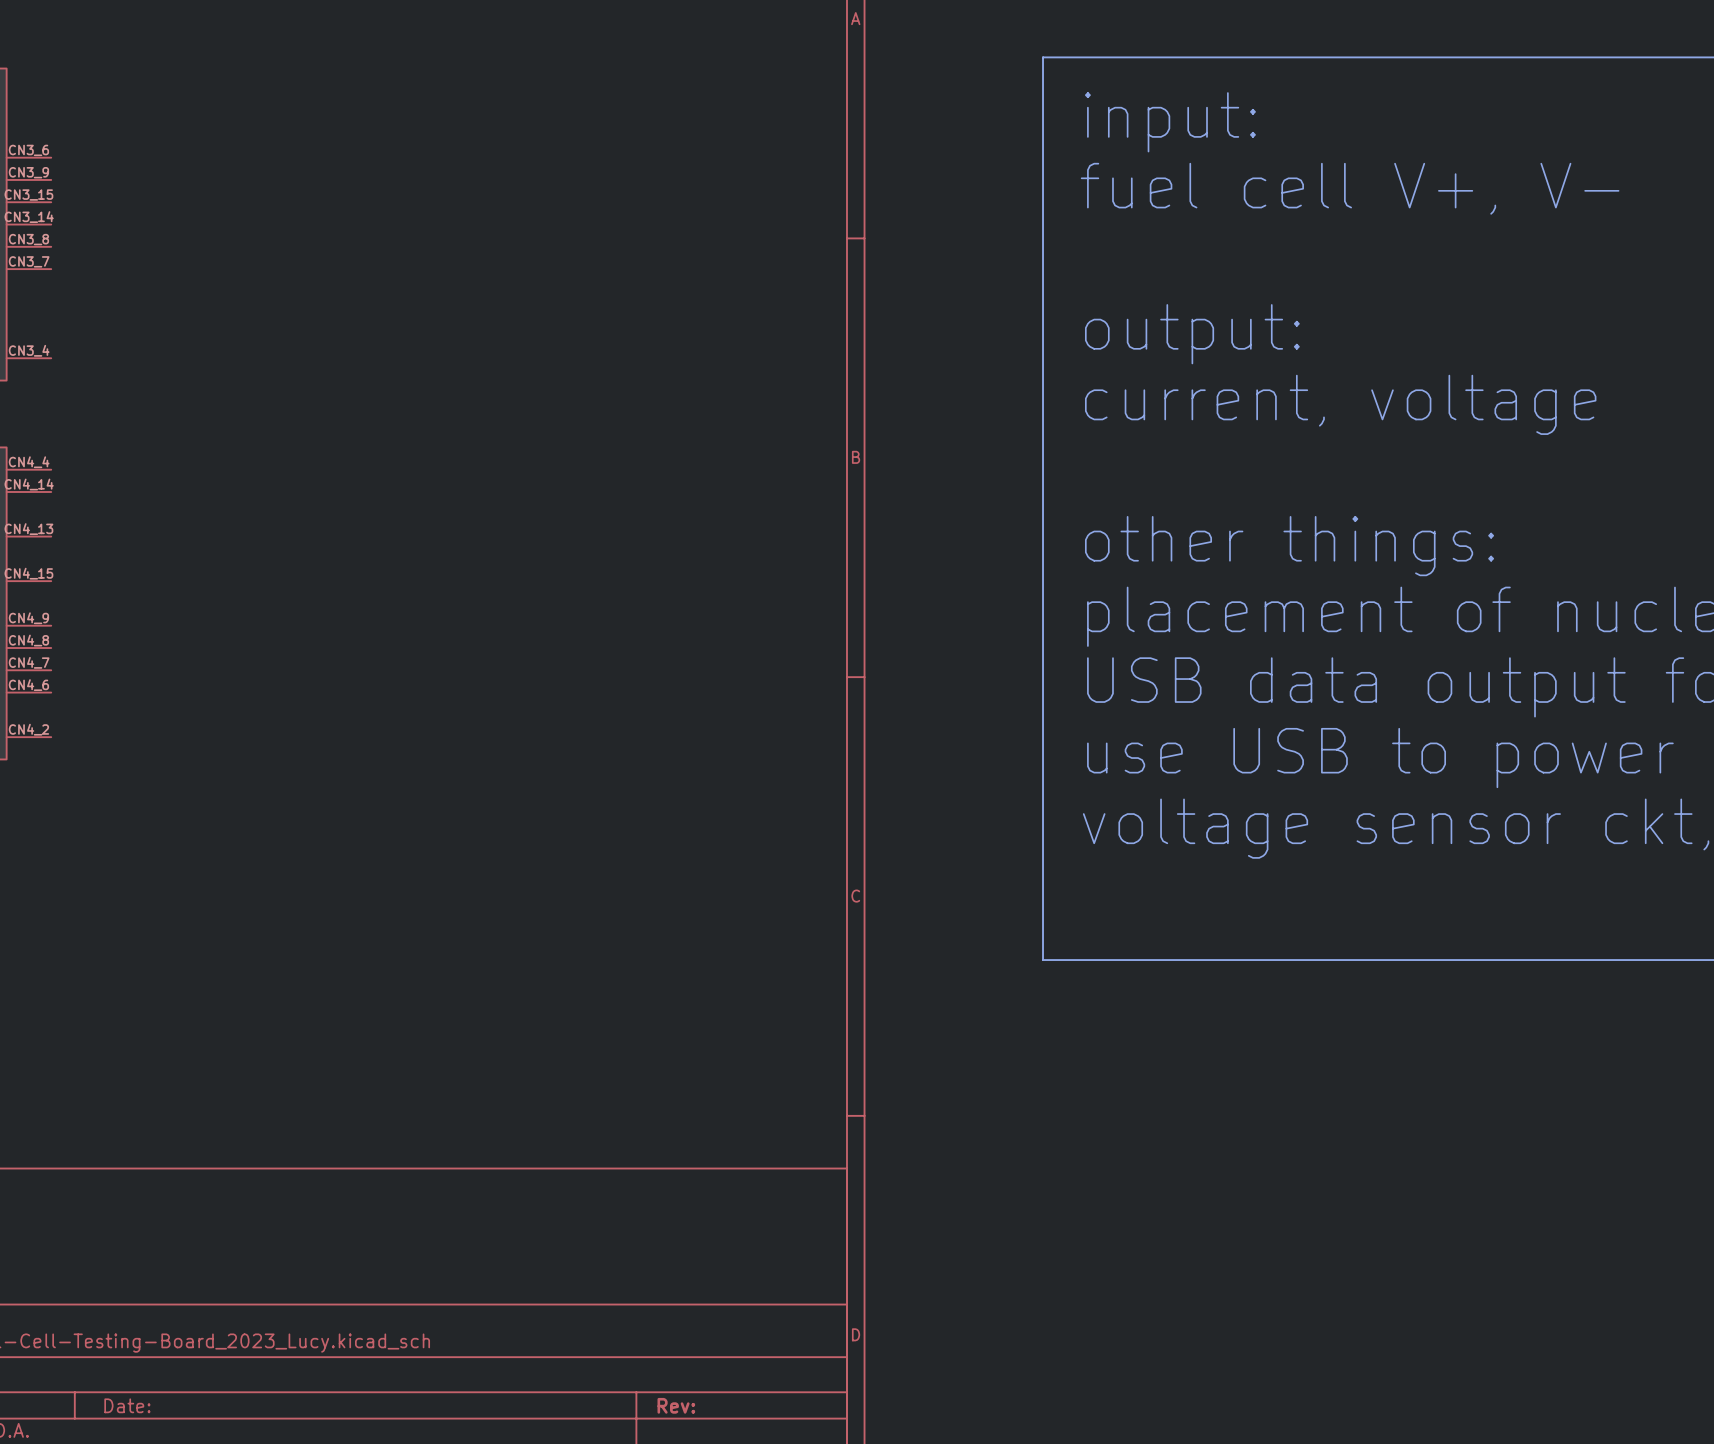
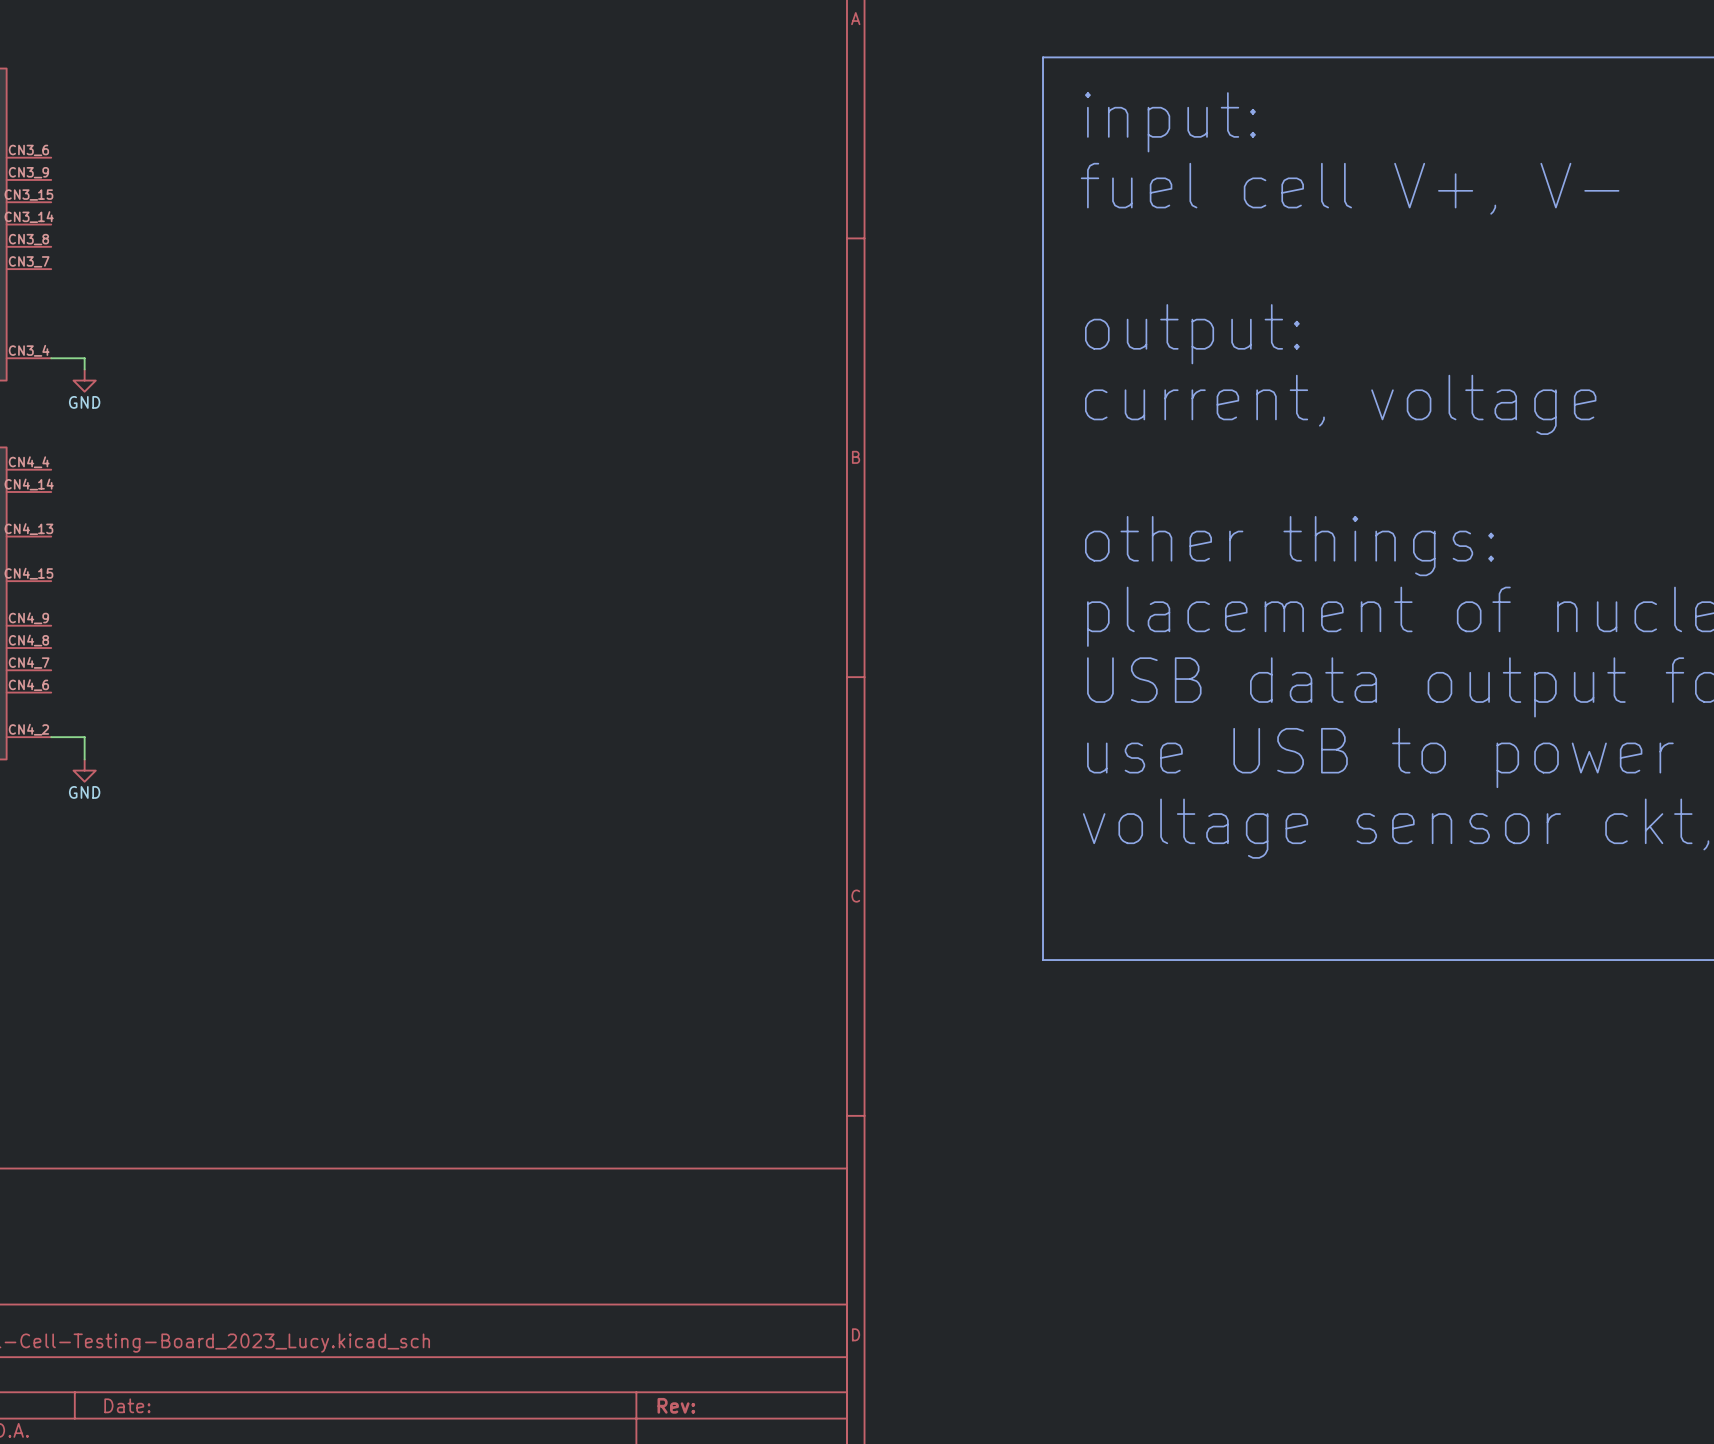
wire: none -> (51, 358) (84, 358) (84, 369)
power symbol: none -> GND (84, 380)
wire: none -> (51, 737) (84, 737) (84, 759)
power symbol: none -> GND (84, 770)

